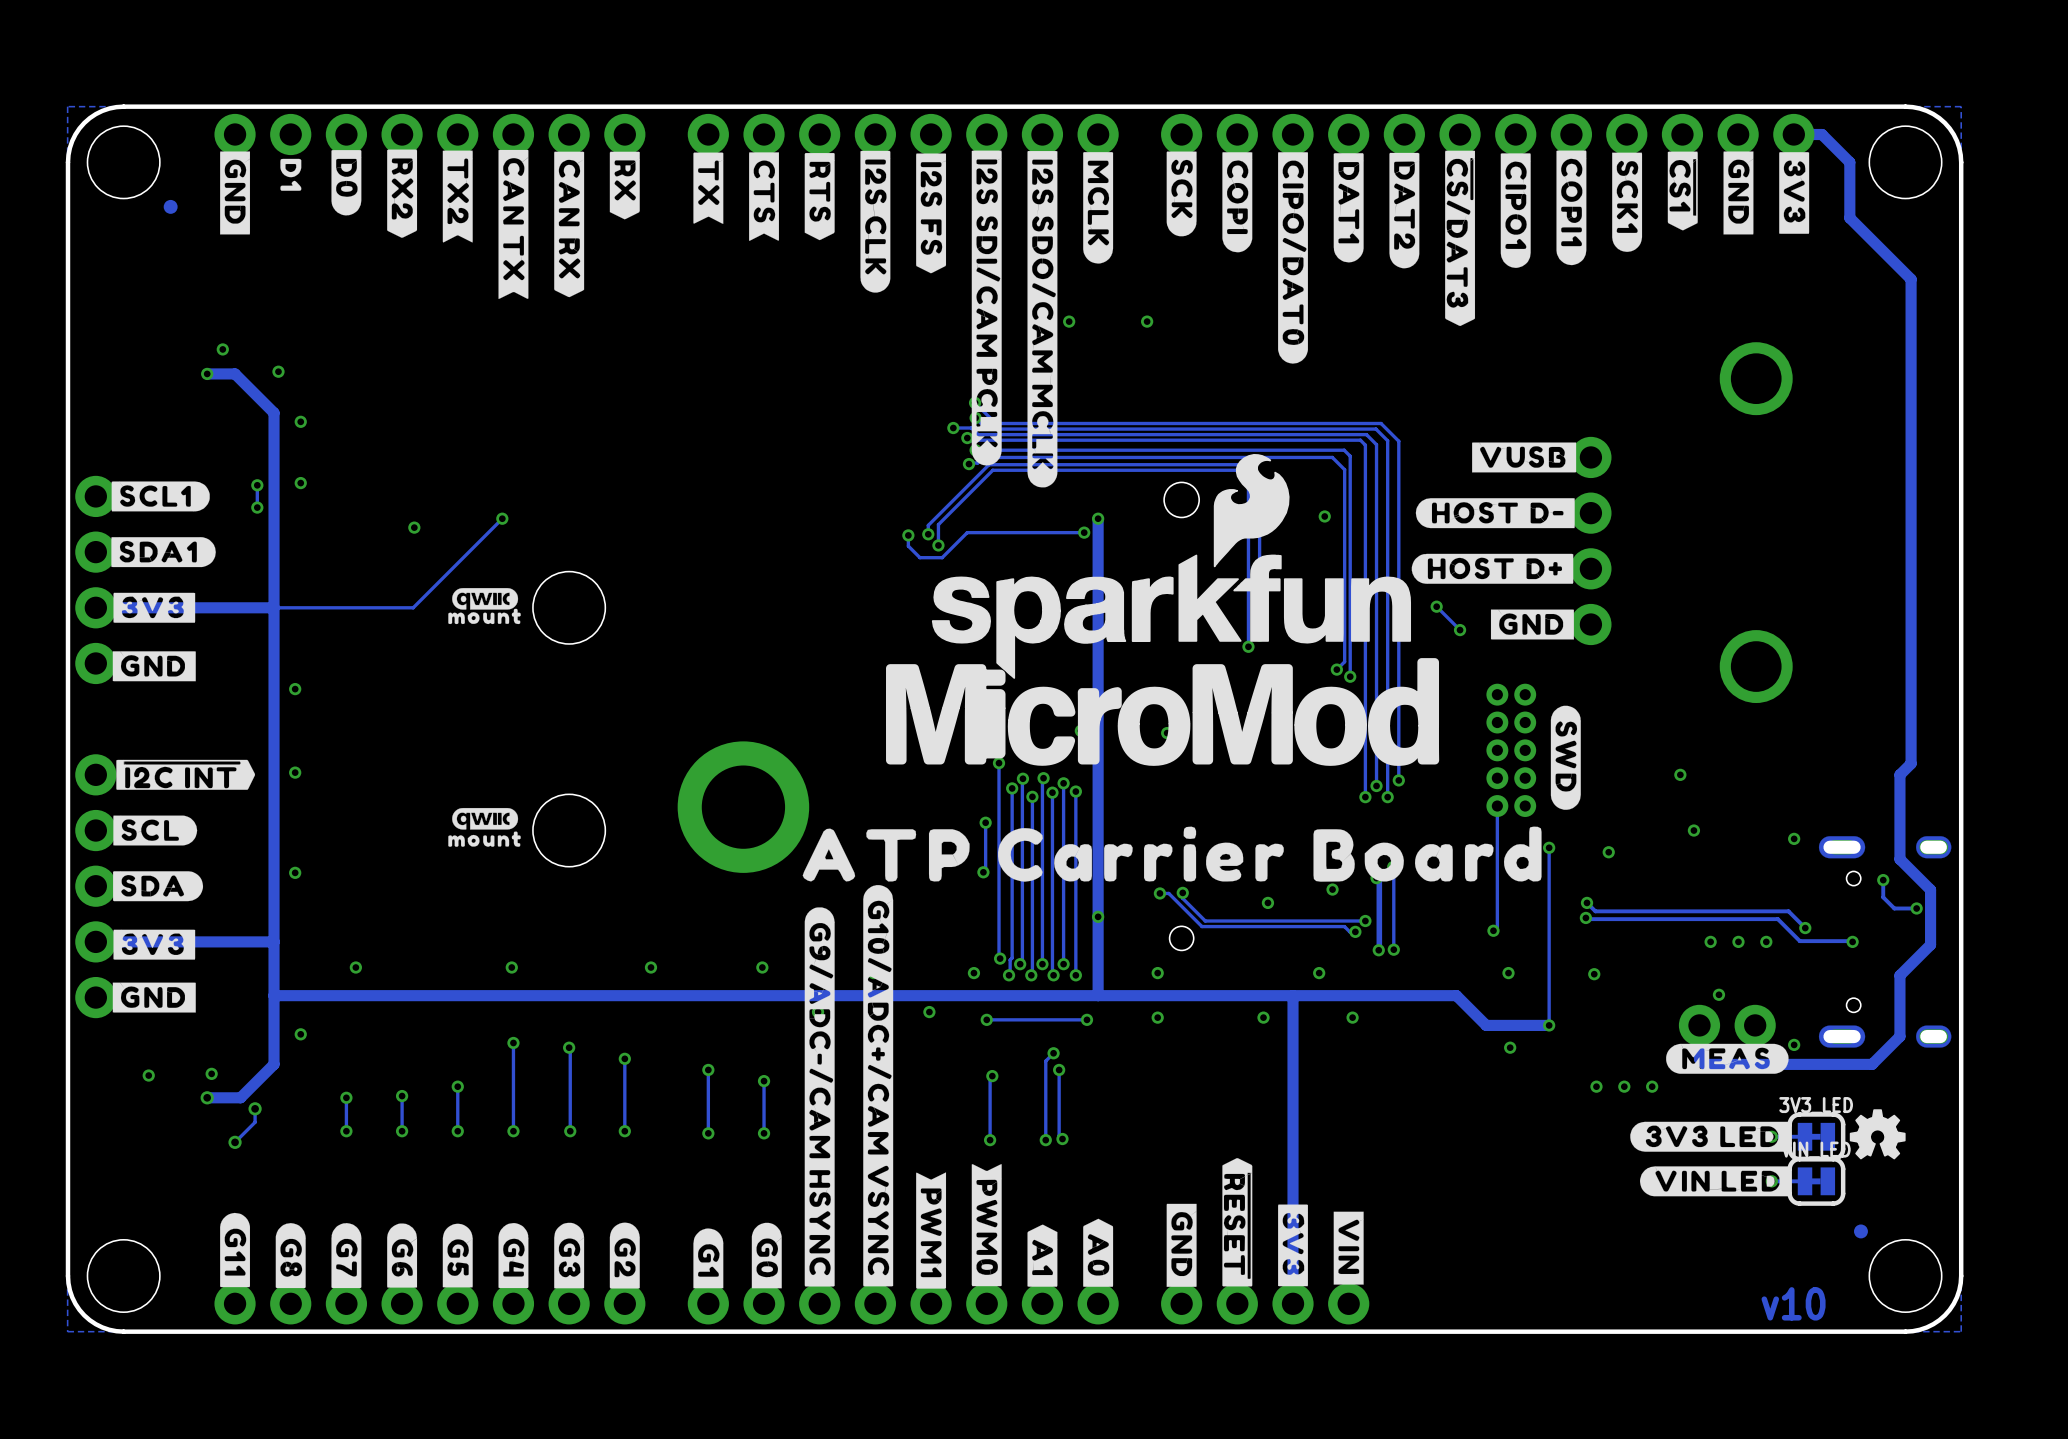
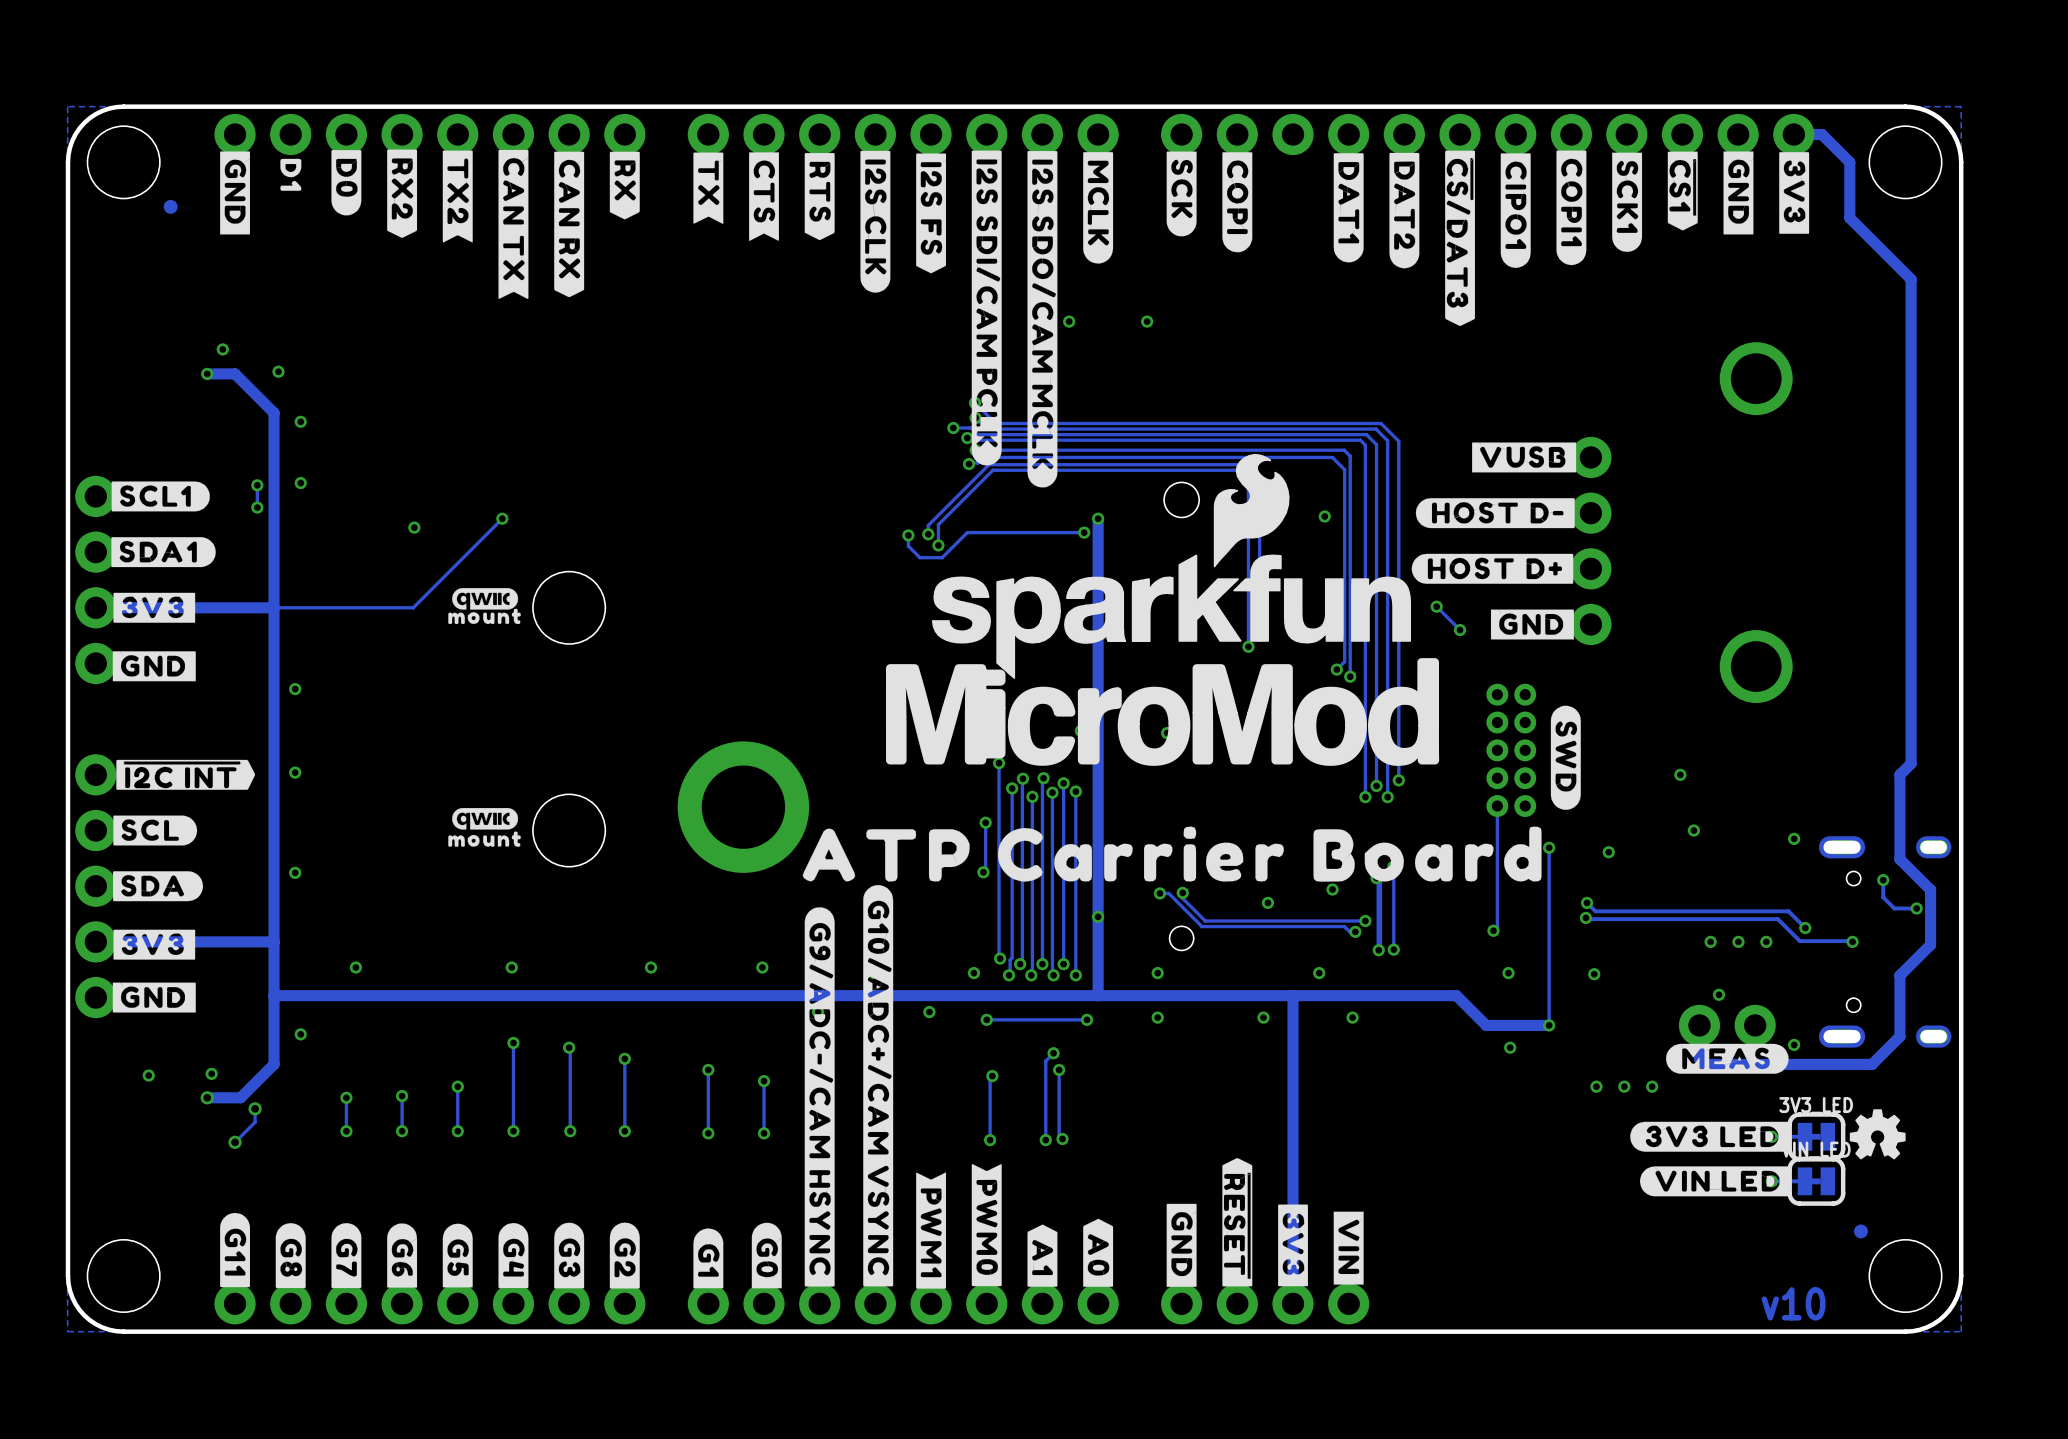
drawing: [1278, 152, 1308, 364] -> none

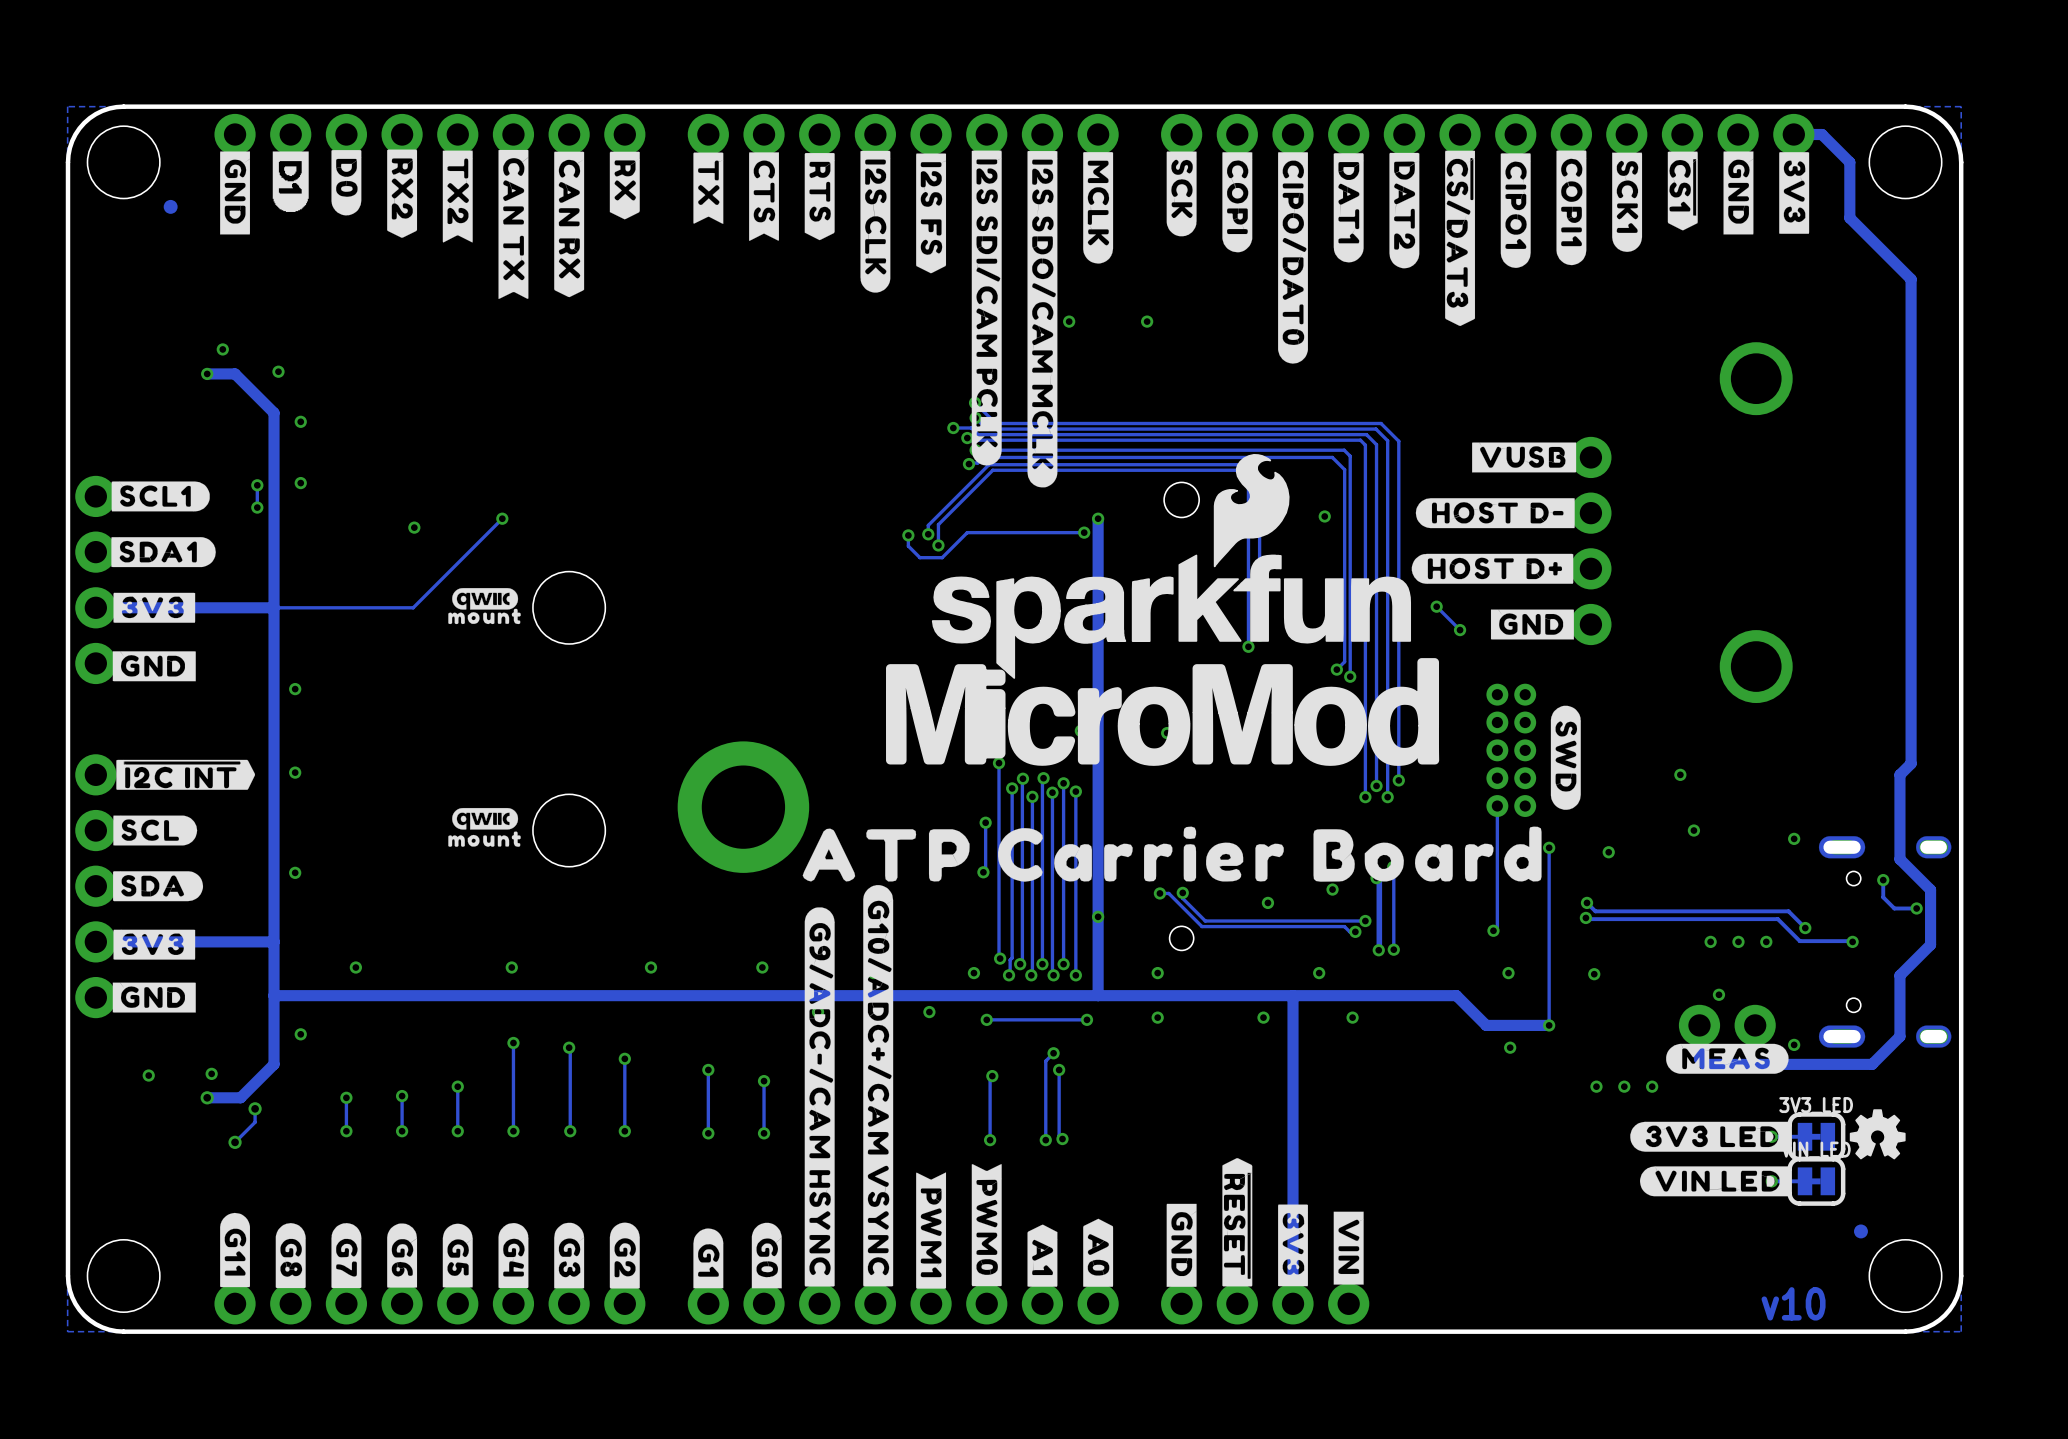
drawing: none -> [1278, 152, 1308, 364]
drawing shape: [280, 158, 302, 191] -> [272, 151, 309, 212]

